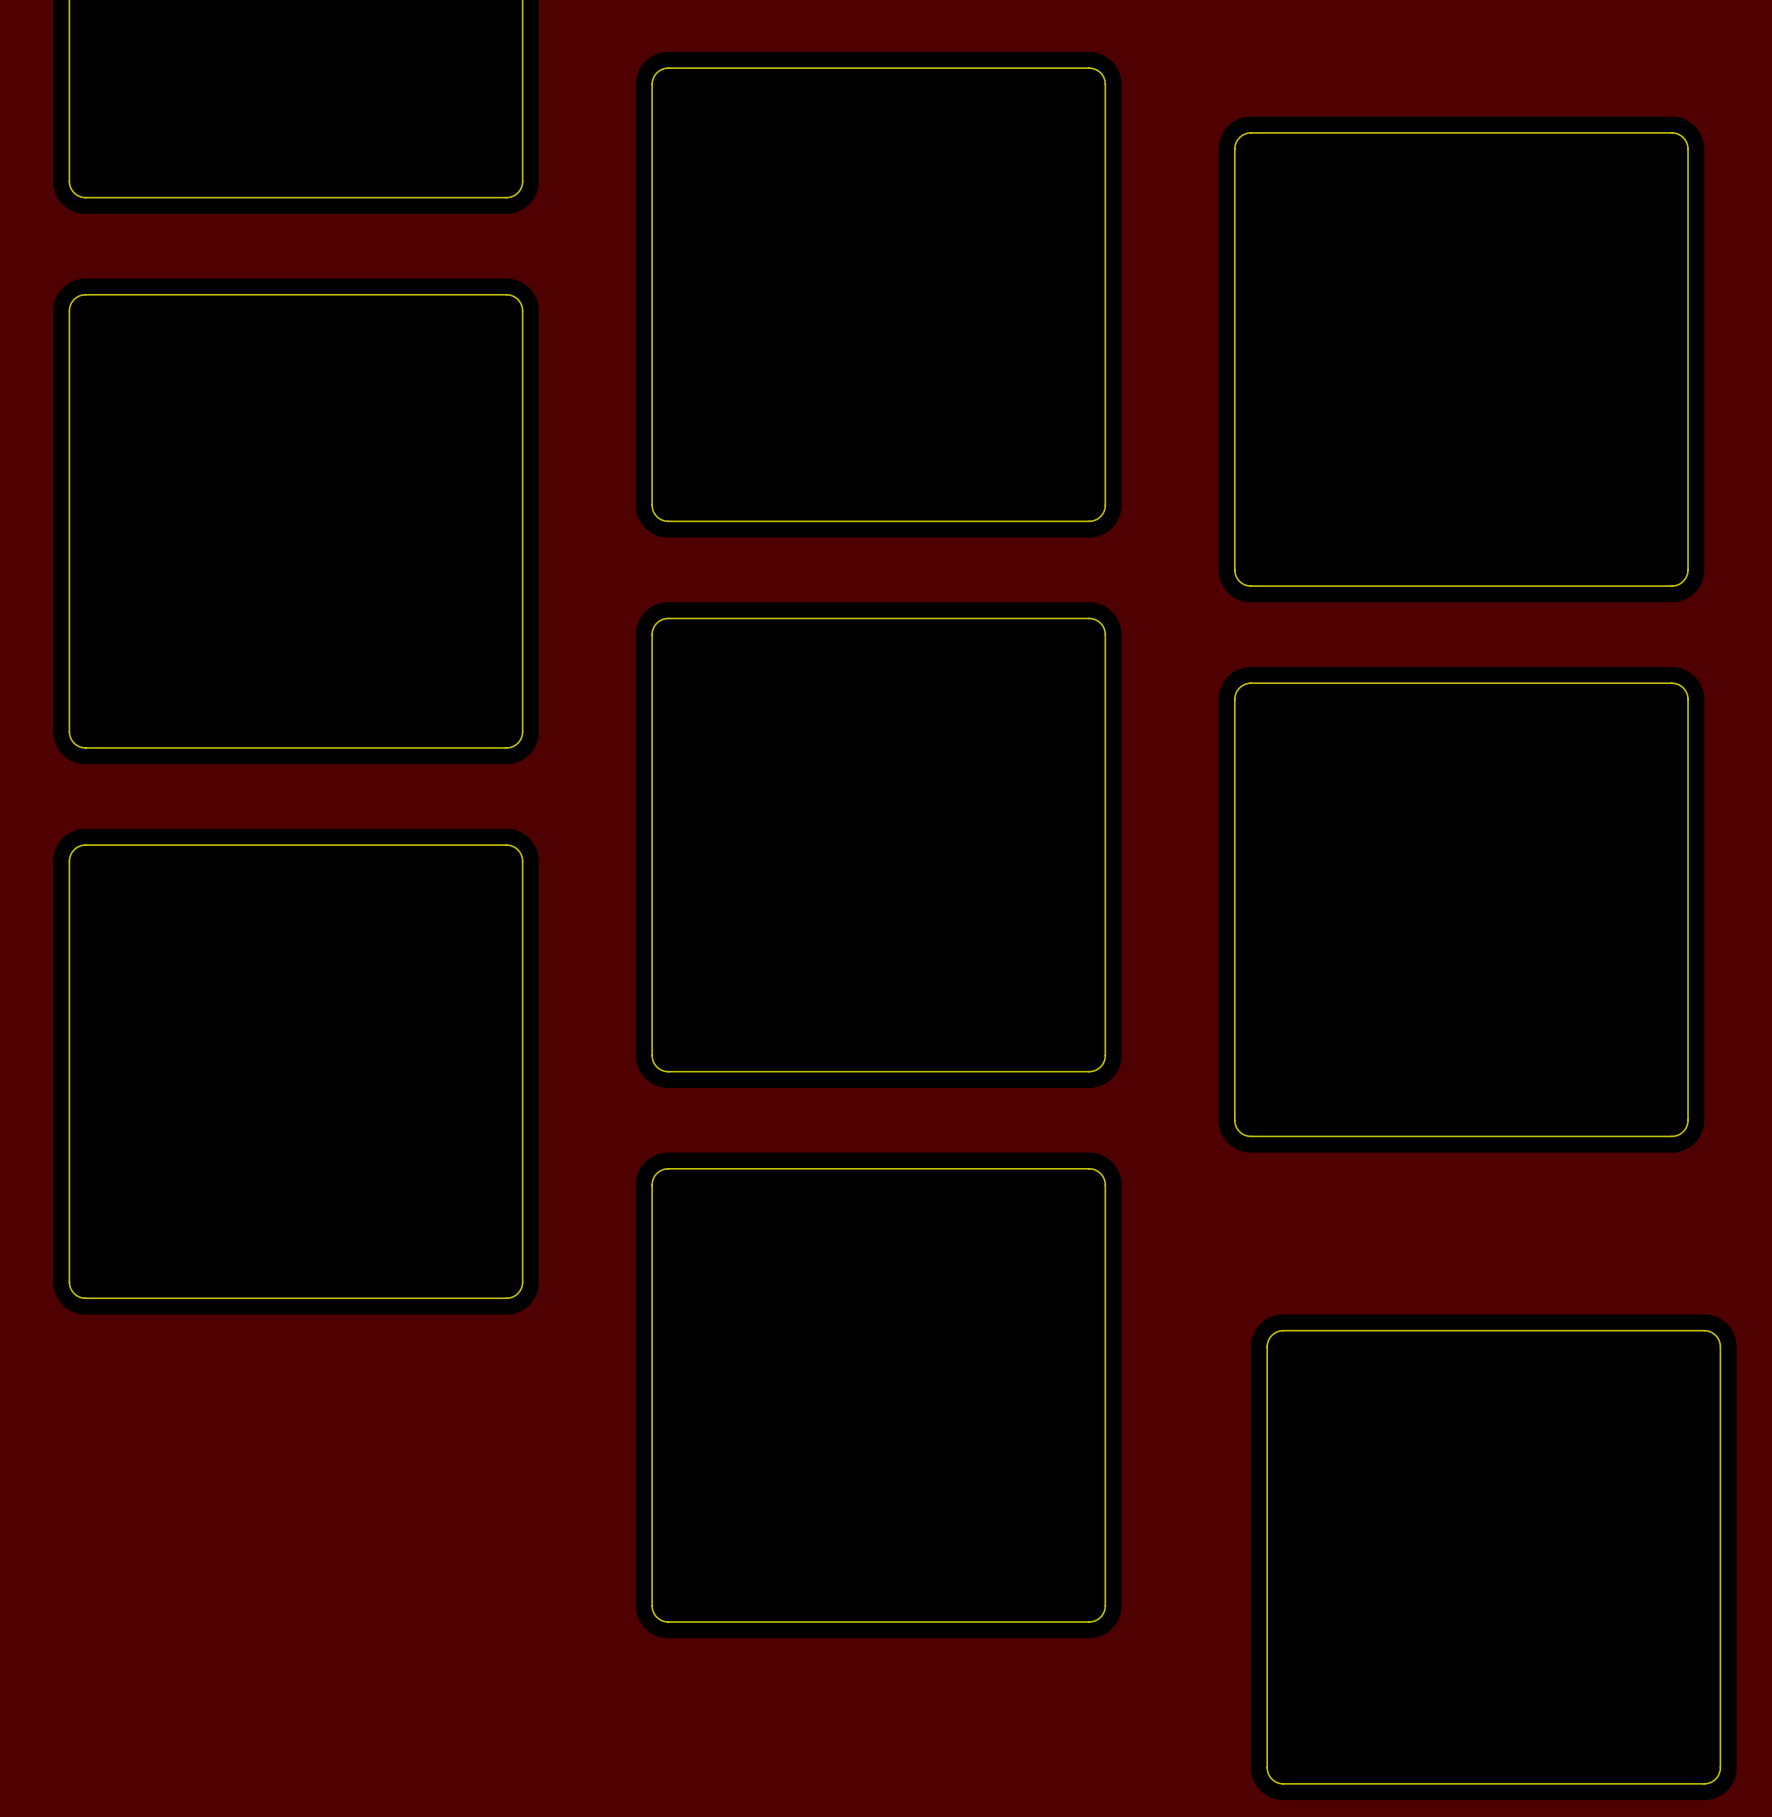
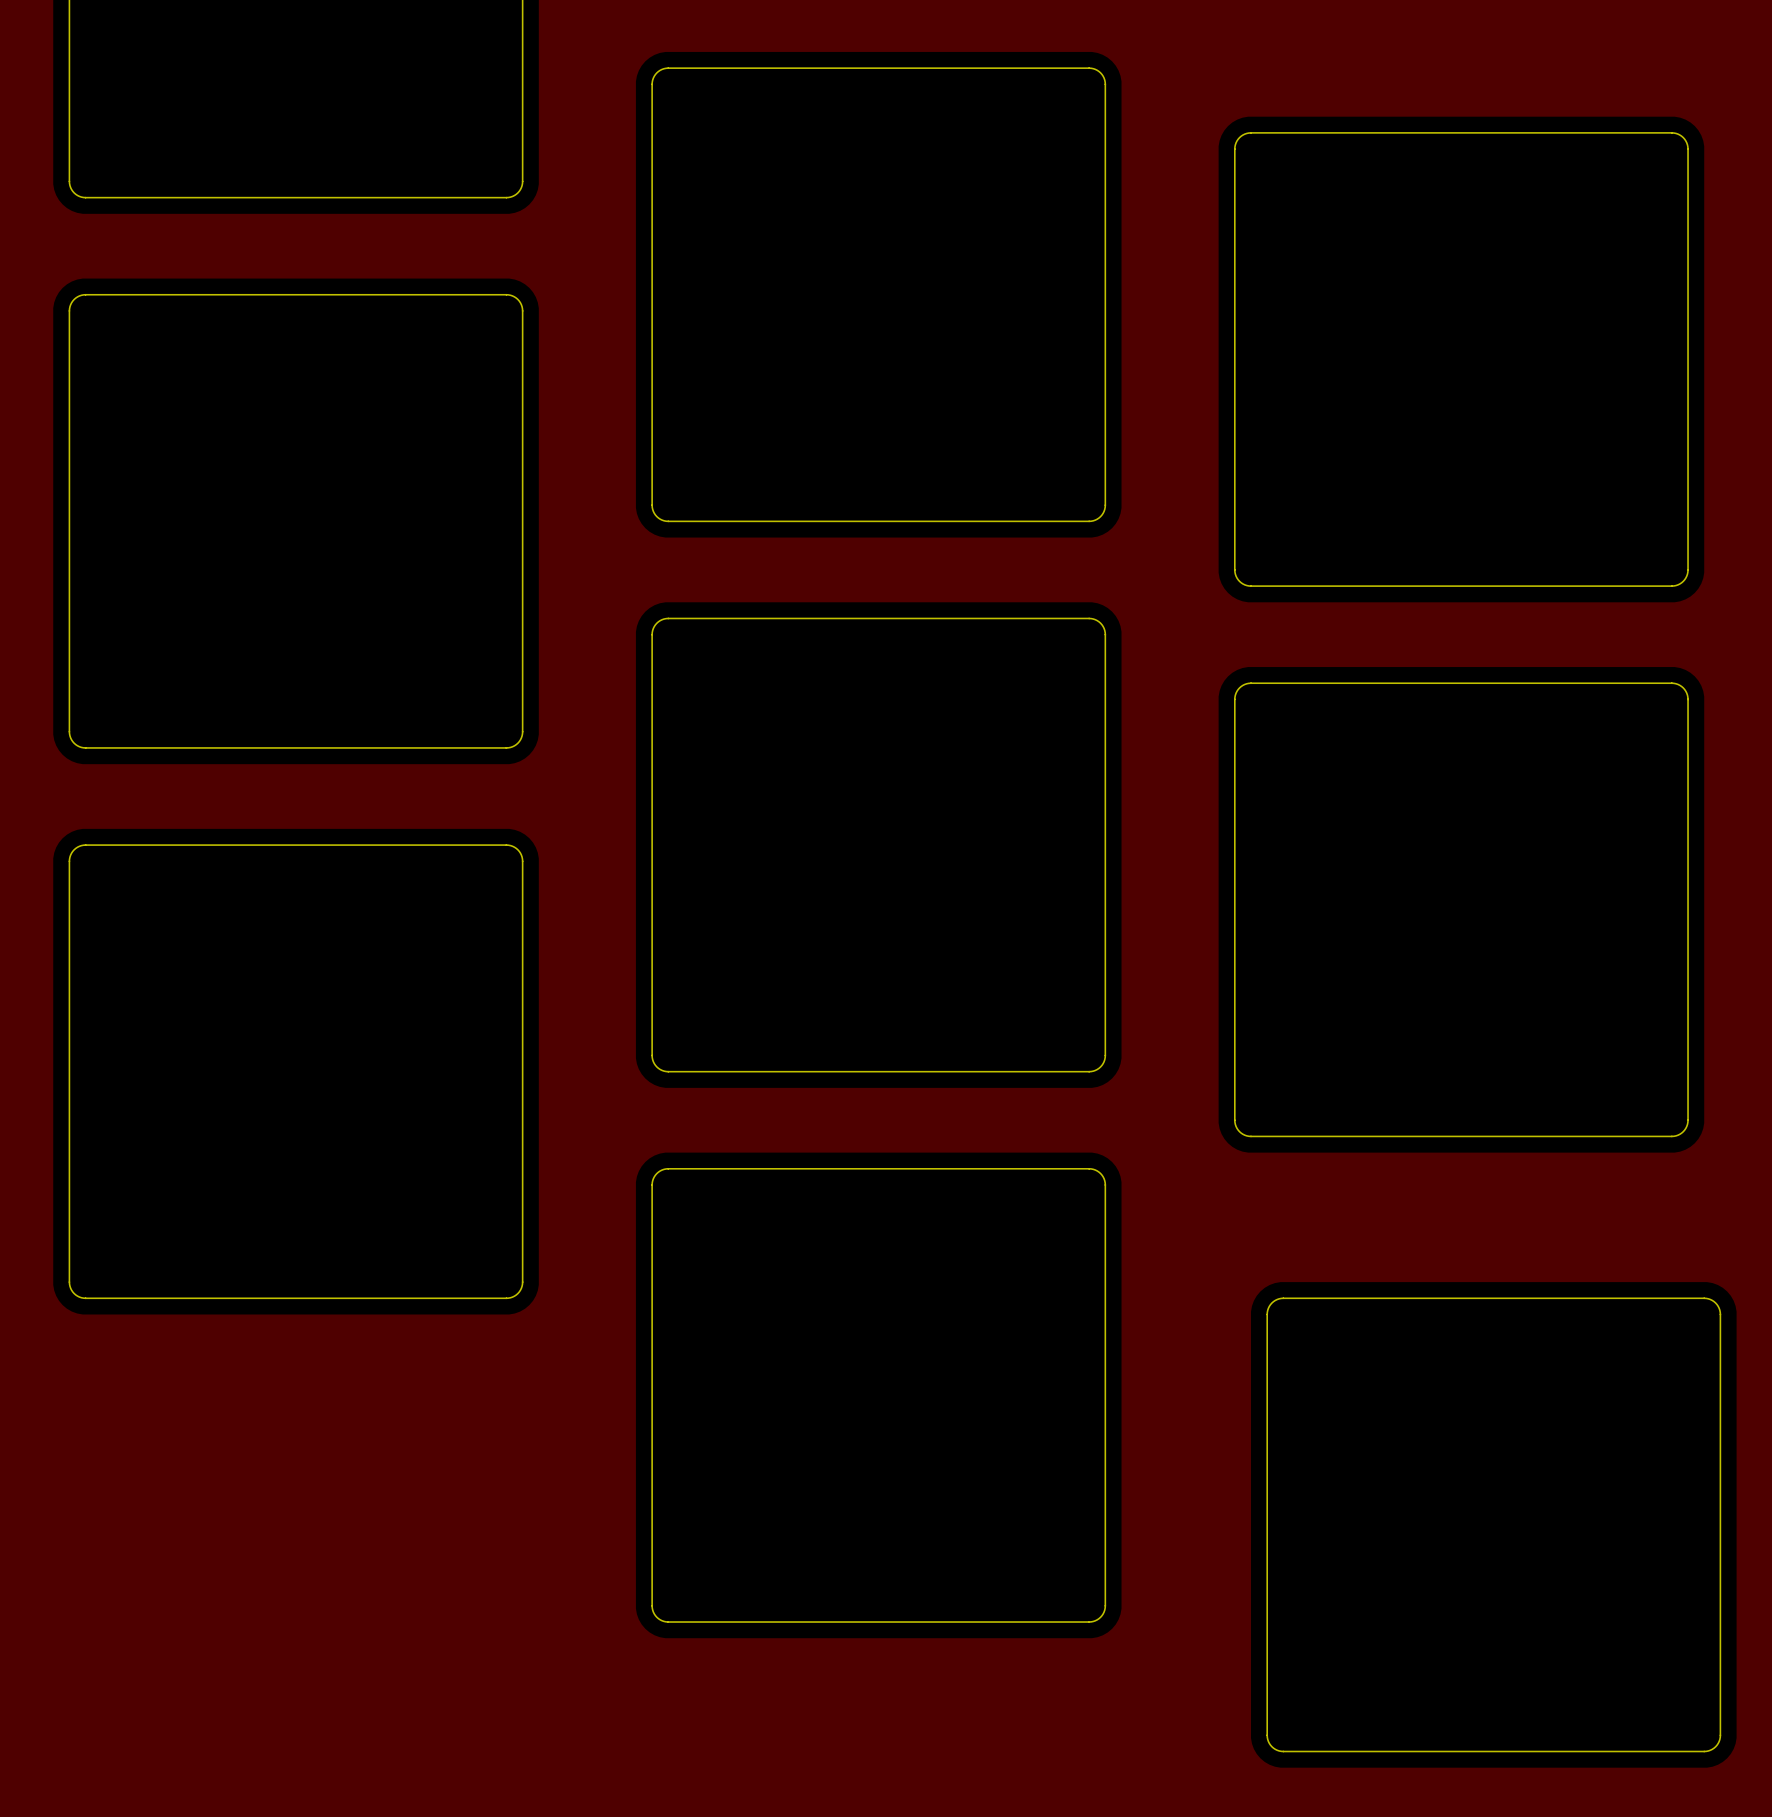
drawing position: (1493, 1557) -> (1493, 1524)

